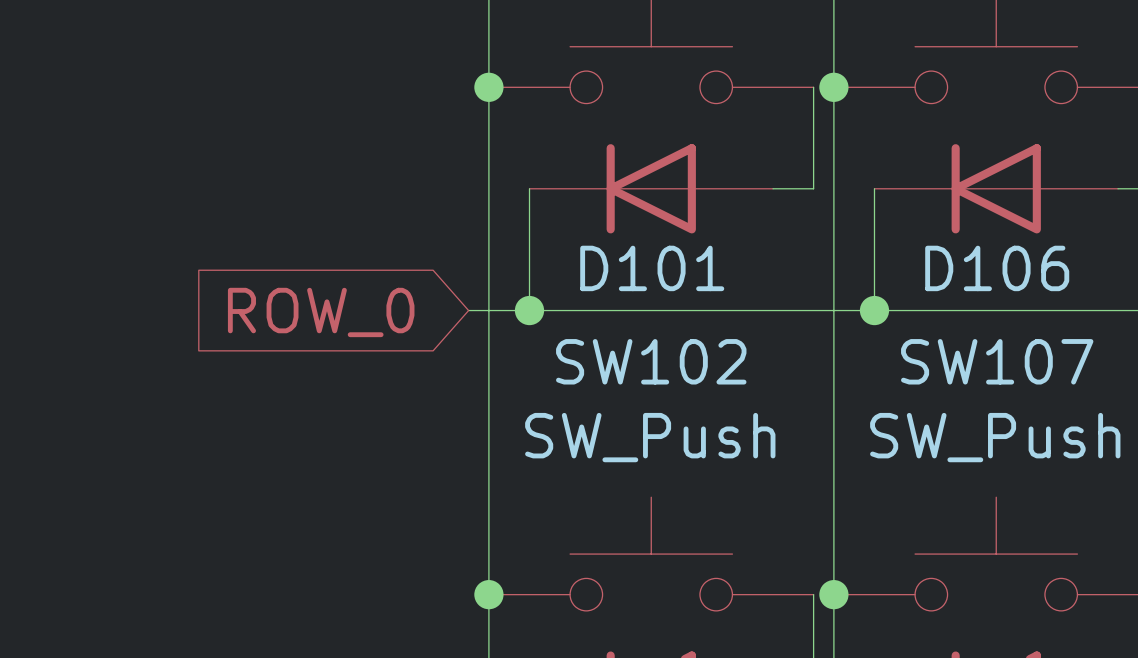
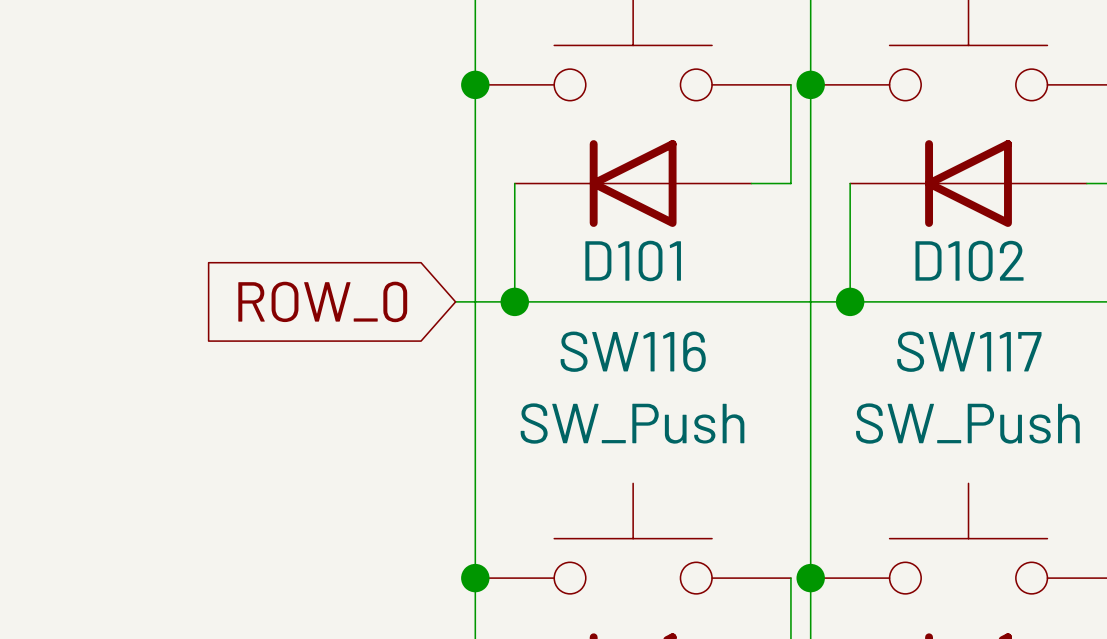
D106 name: D106 (997, 268) -> D102 (969, 260)
SW102 name: SW102 (651, 361) -> SW116 (633, 351)
SW107 name: SW107 (997, 361) -> SW117 (969, 351)

